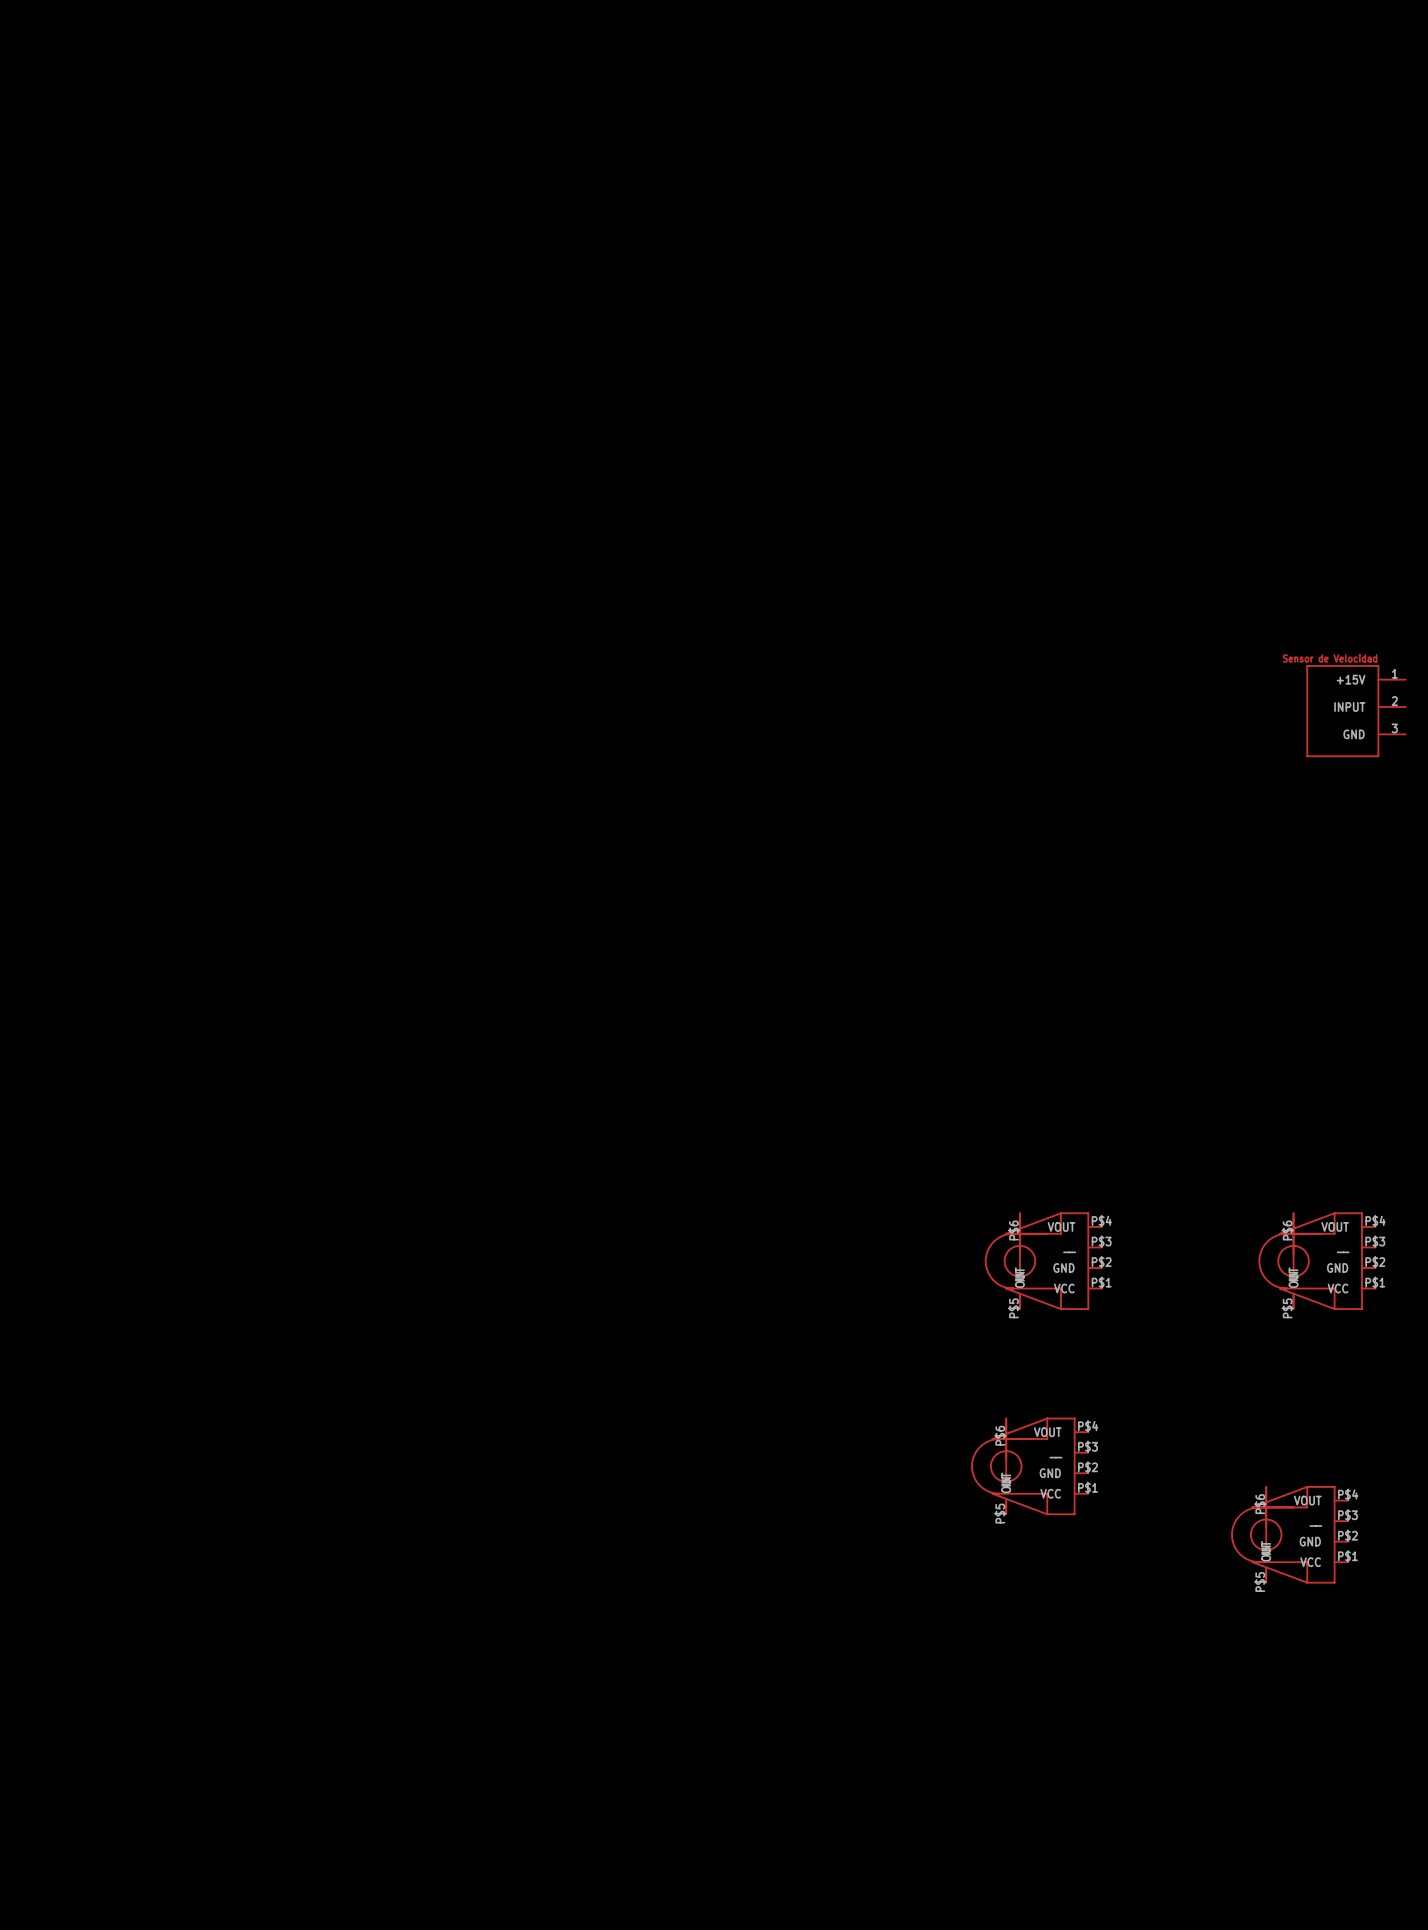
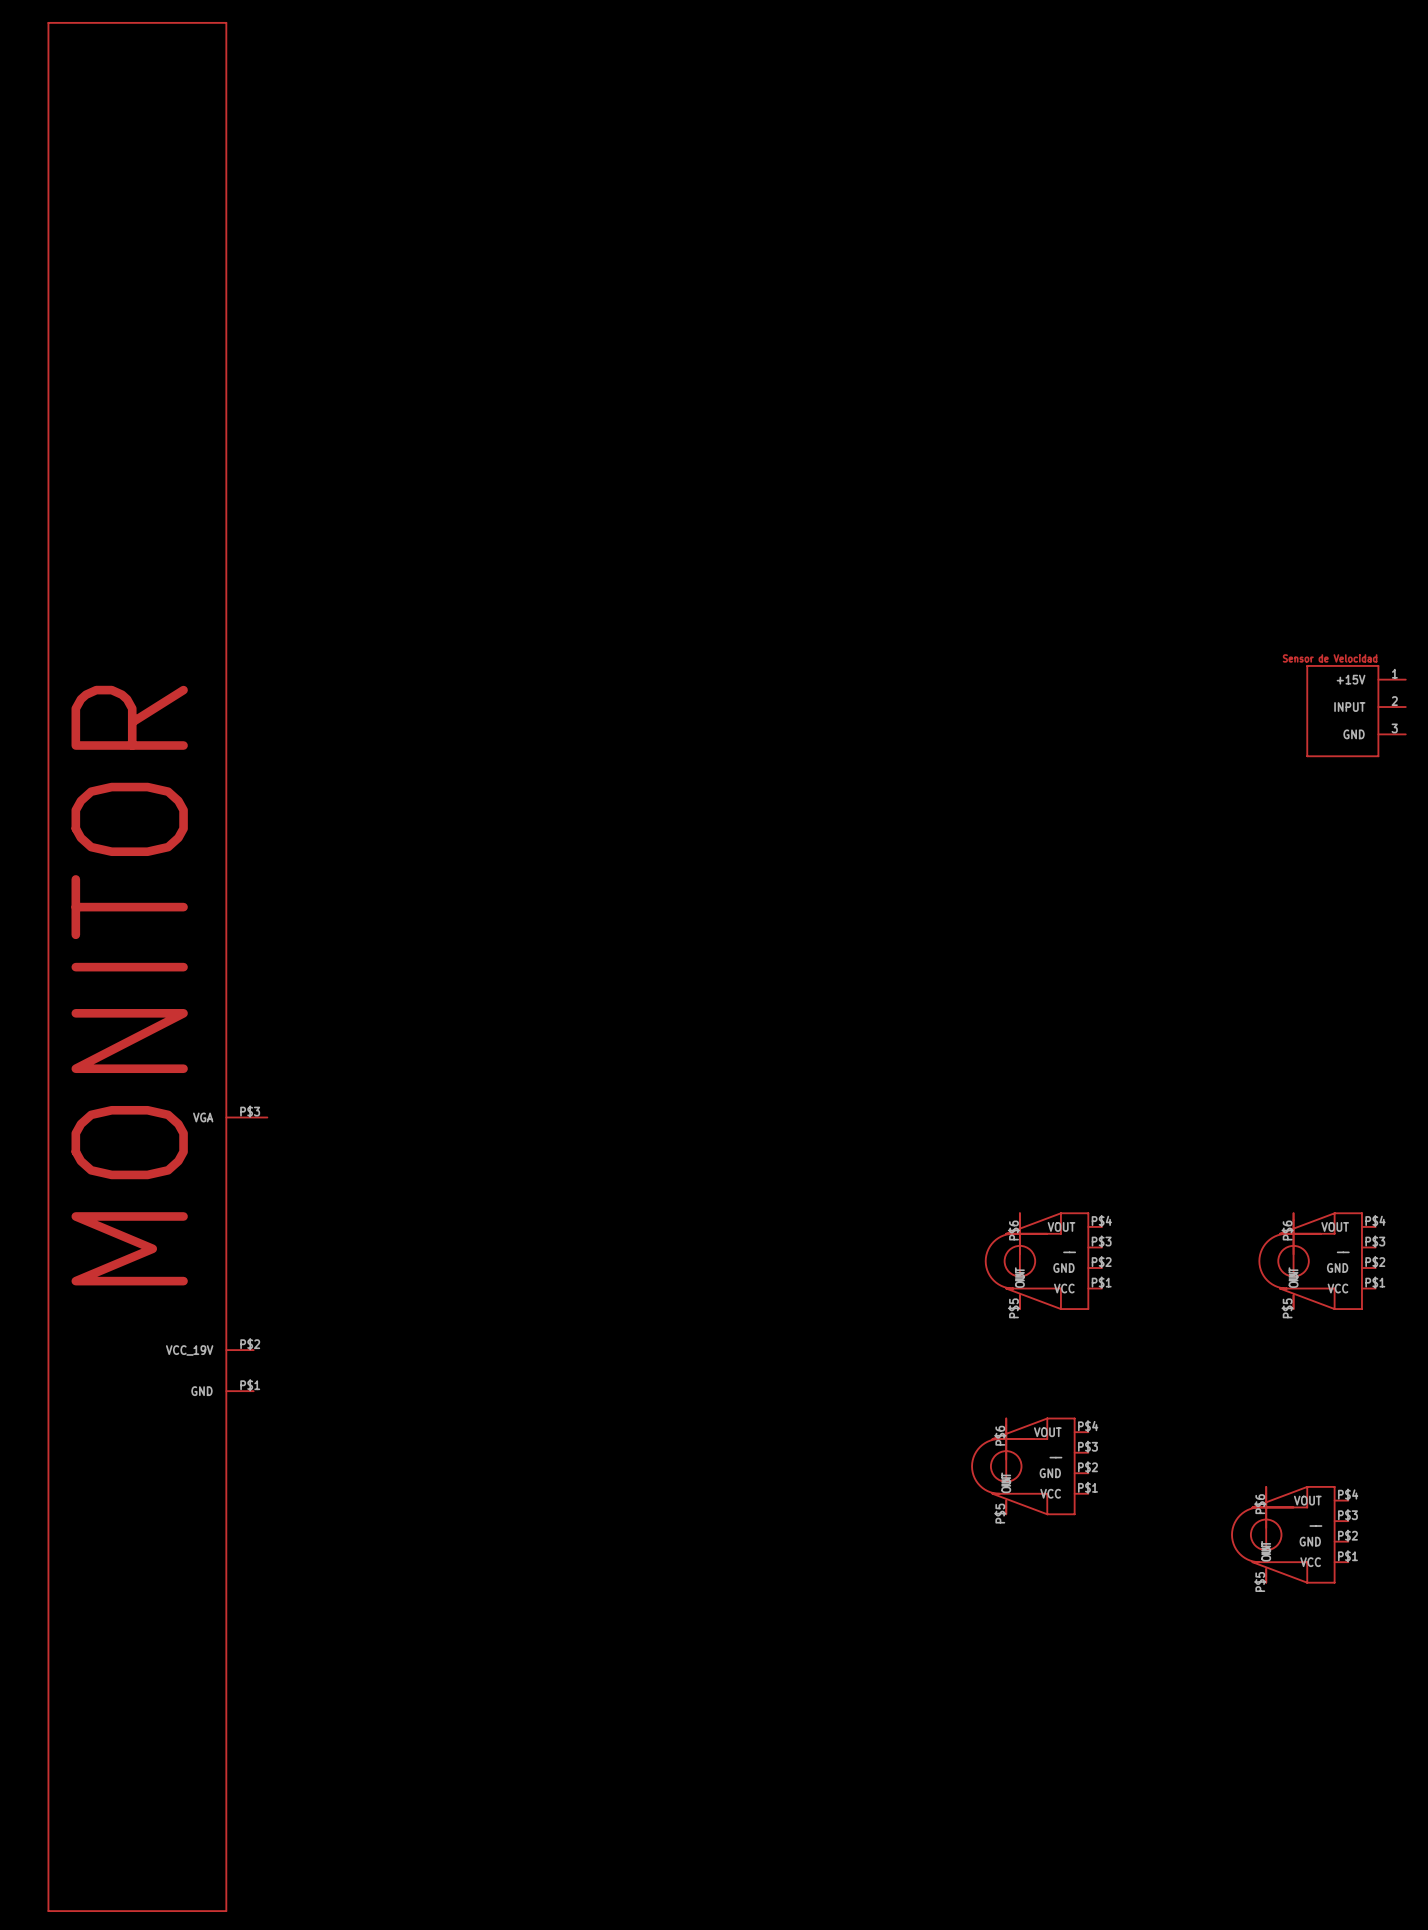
part: none -> (157, 966)

